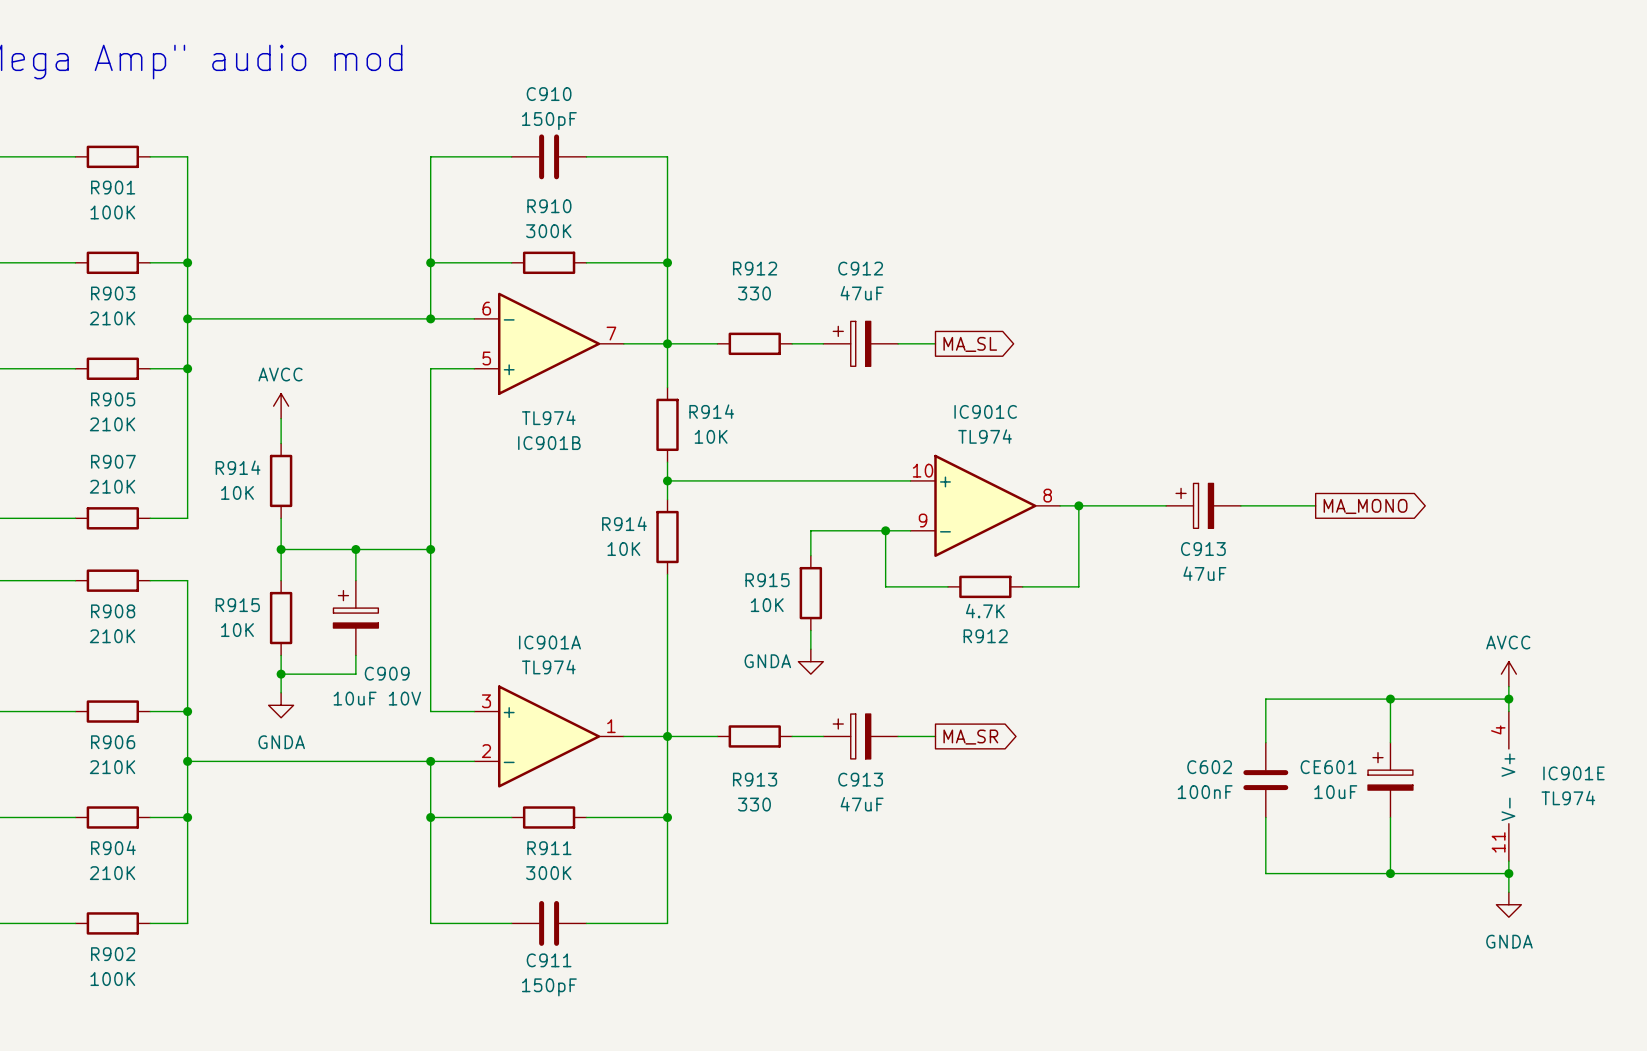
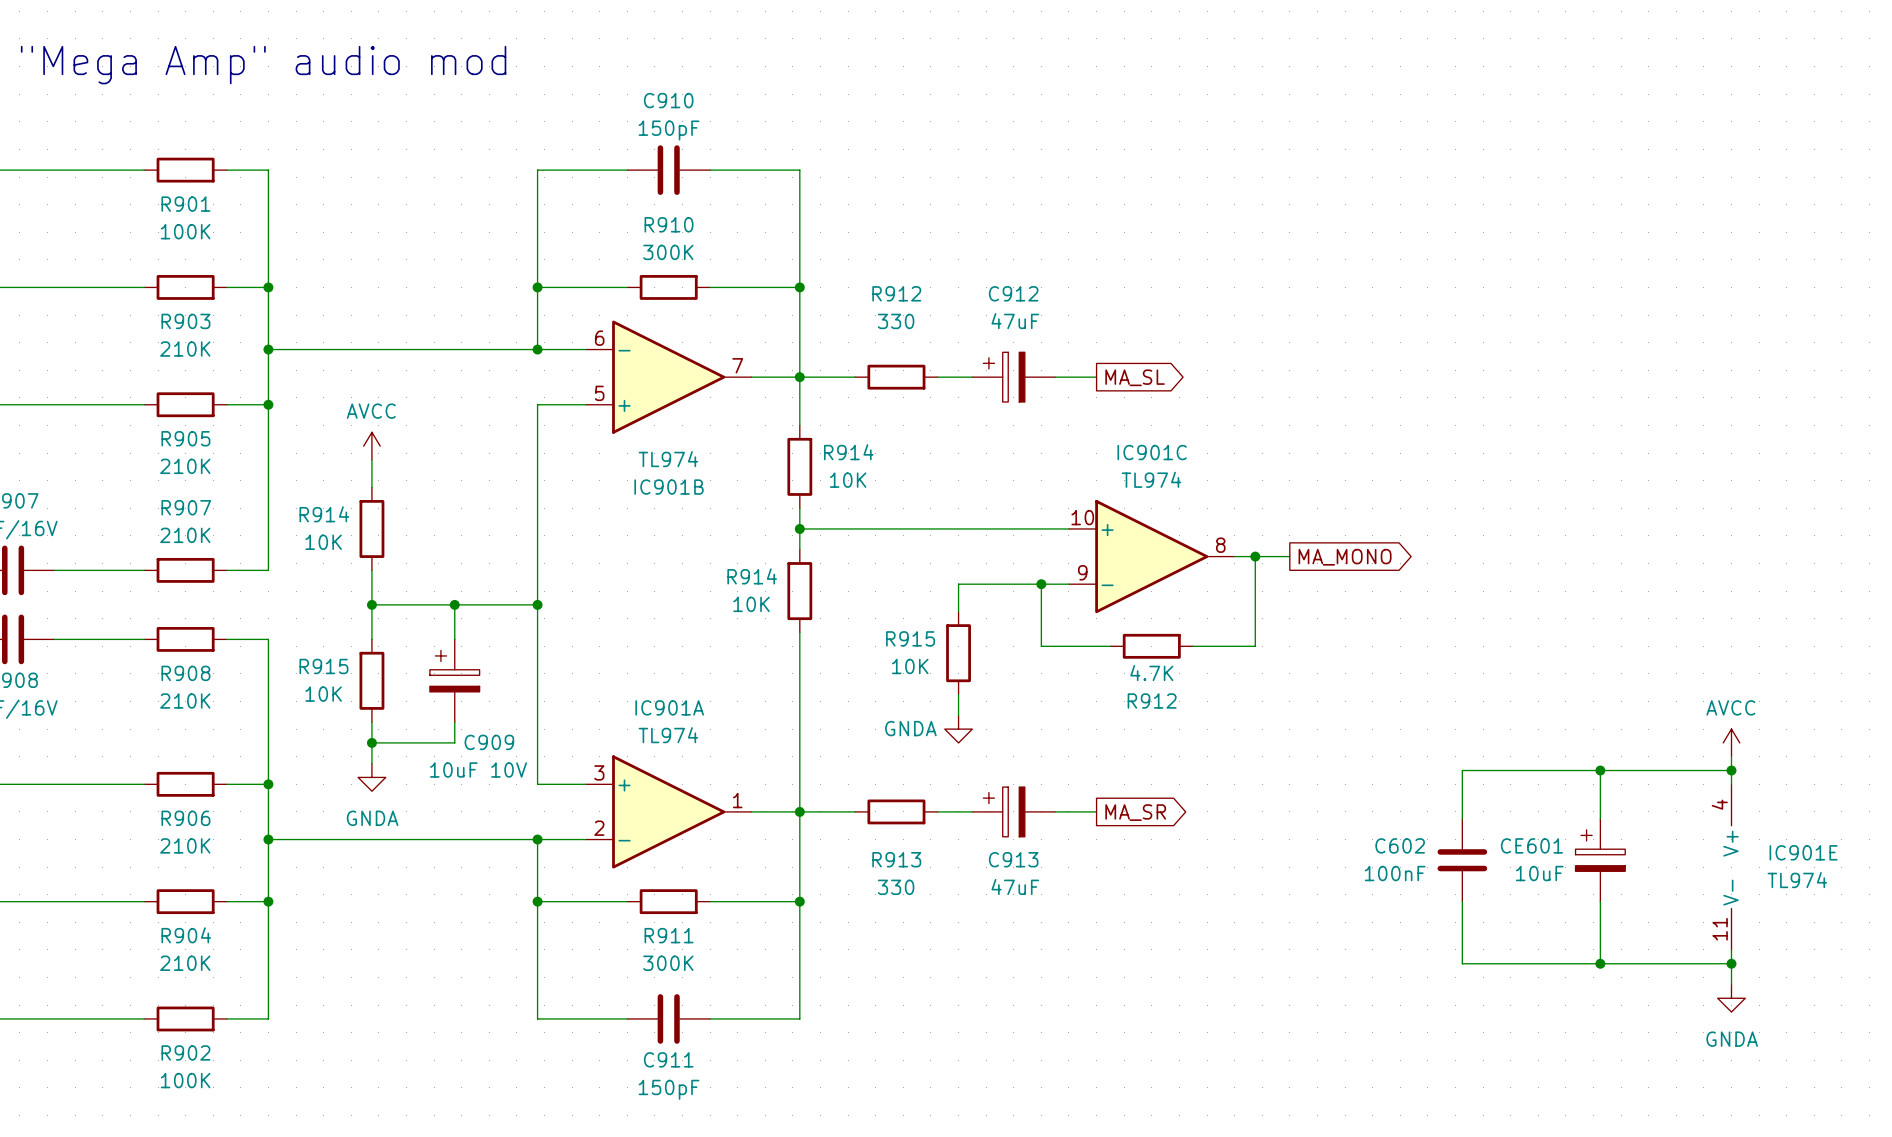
wire: (1110, 505) (1166, 505) -> none
C913: 47uF (1203, 505) -> none
wire: (1240, 505) (1315, 505) -> none
global label position: MA_MONO (1365, 506) -> MA_MONO (1345, 557)

